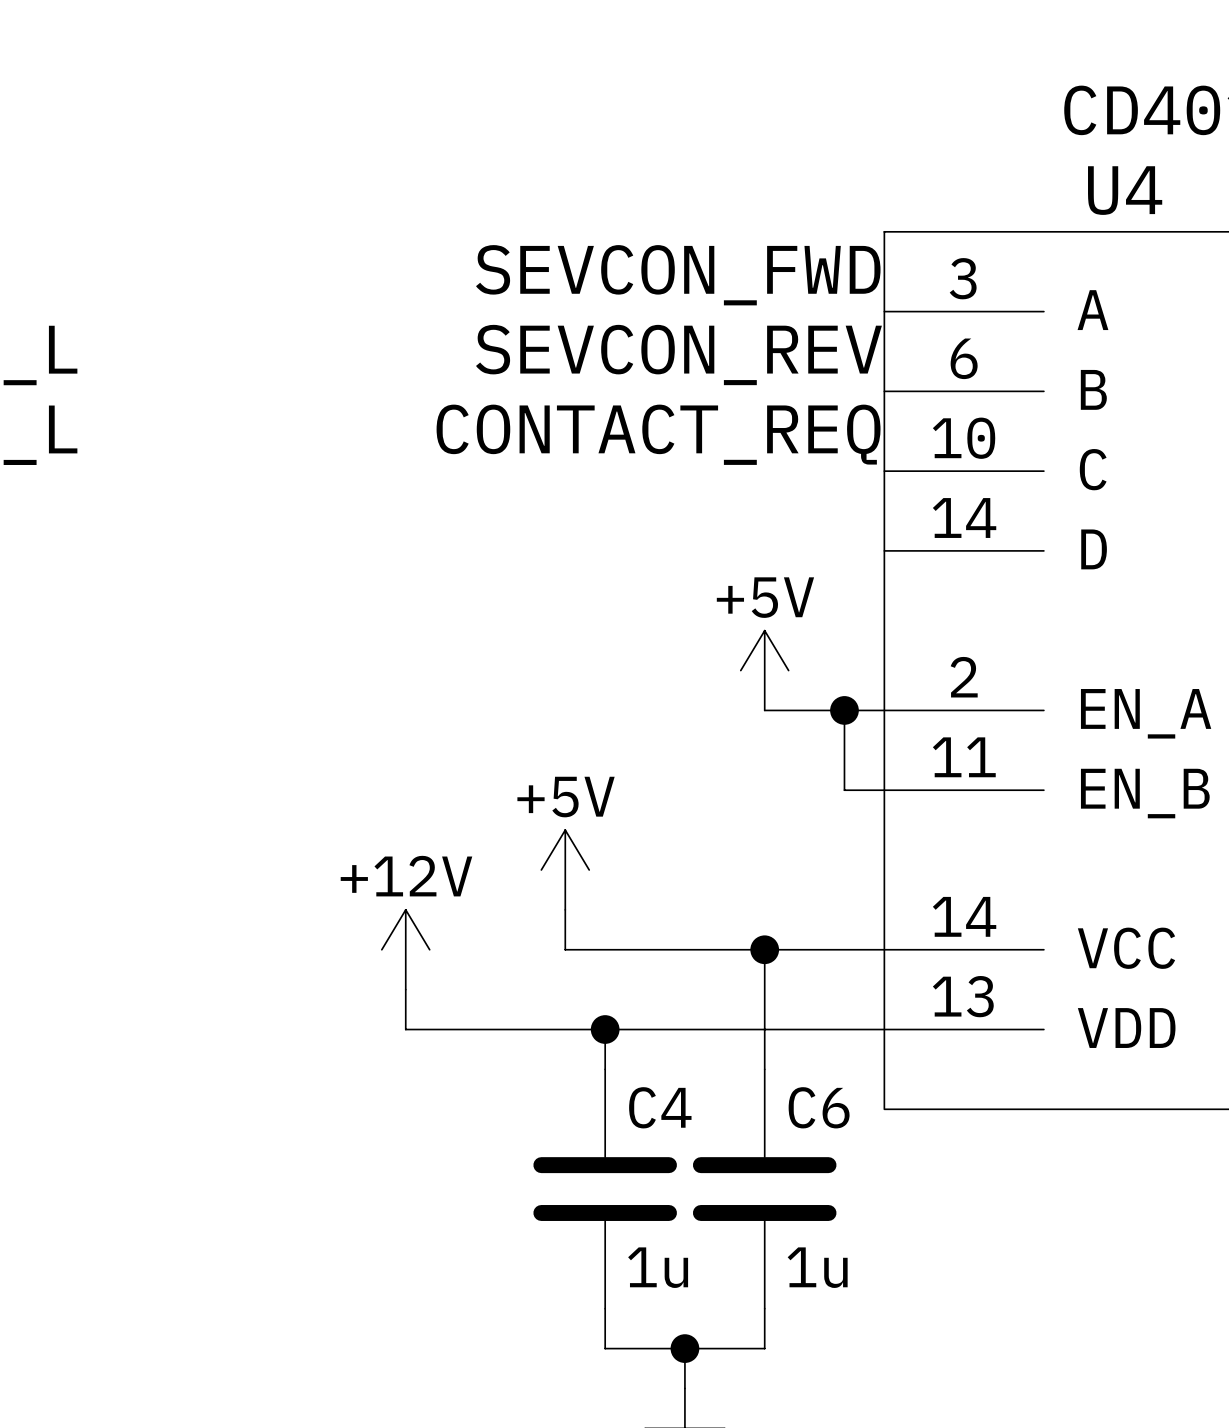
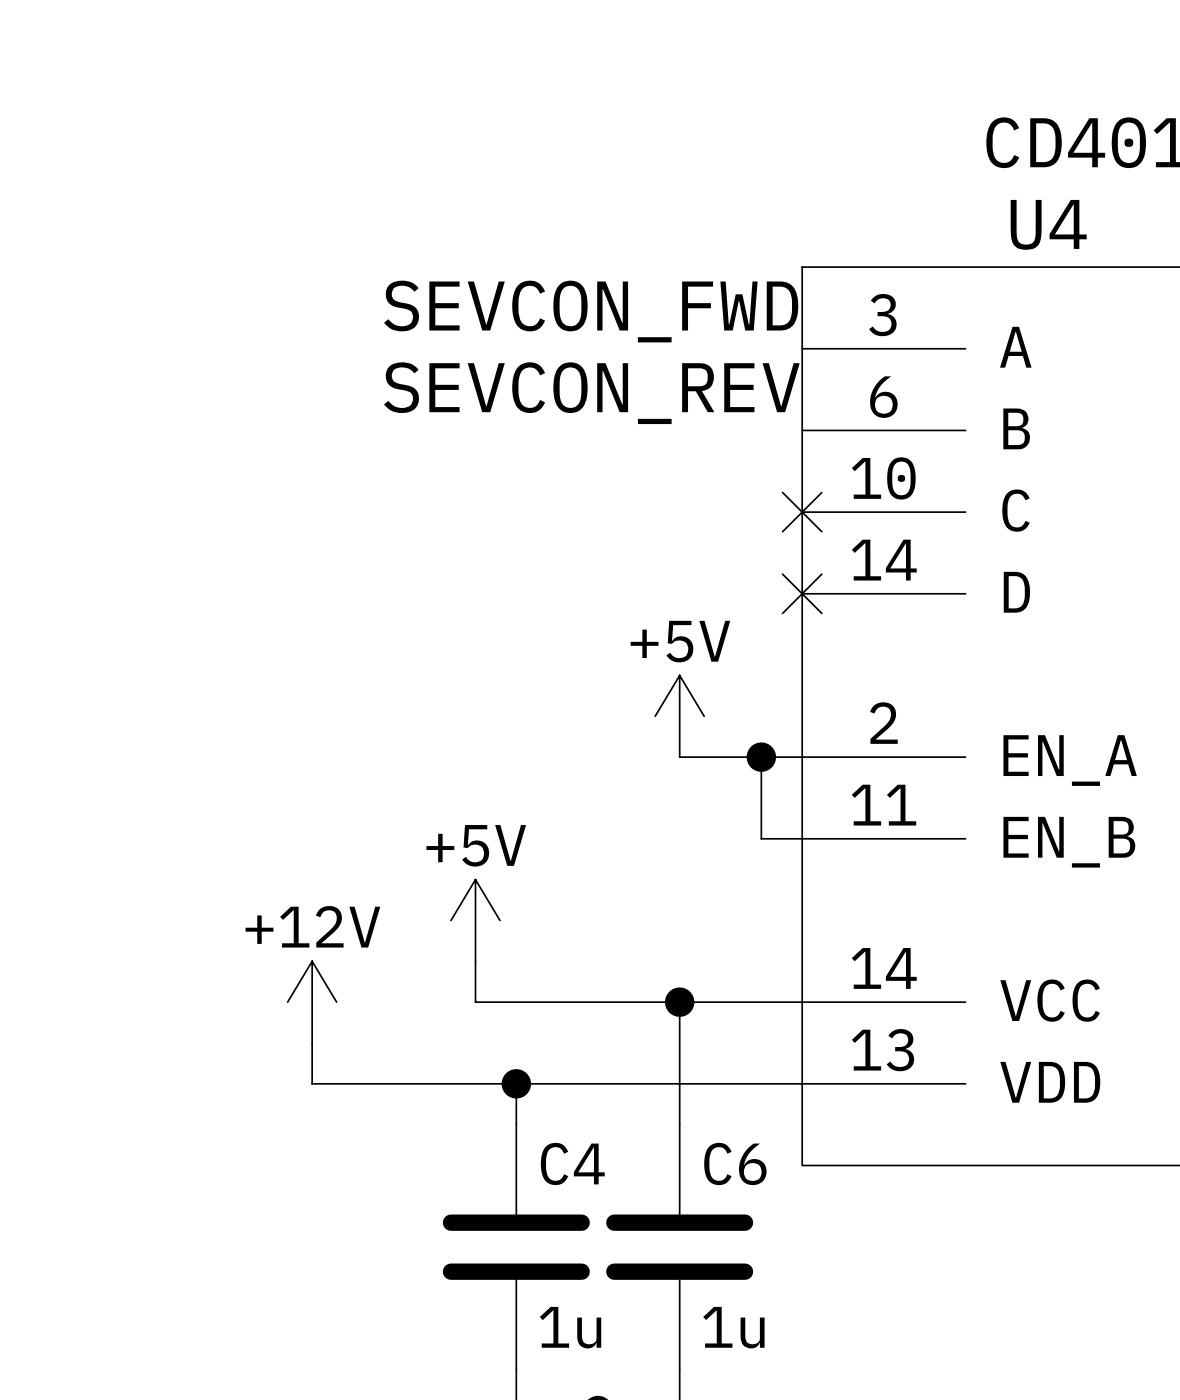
label: CONTACT_REQ (658, 434) -> none
no-connect mark: none -> (802, 512)
no-connect mark: none -> (802, 593)

